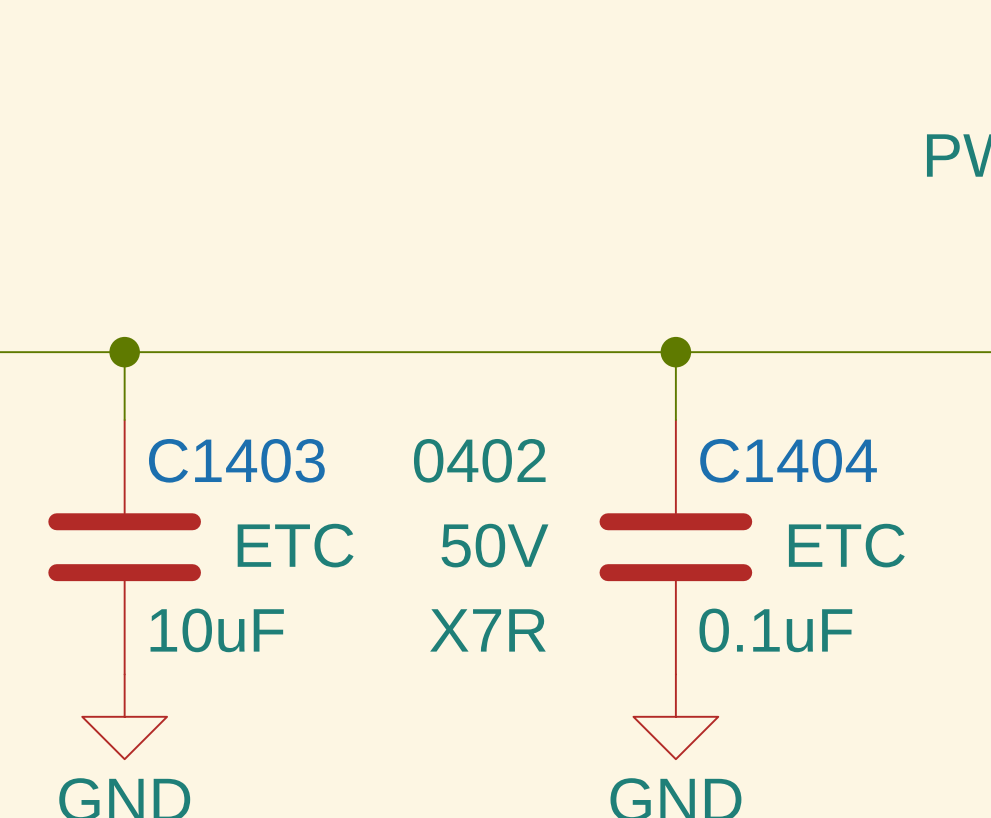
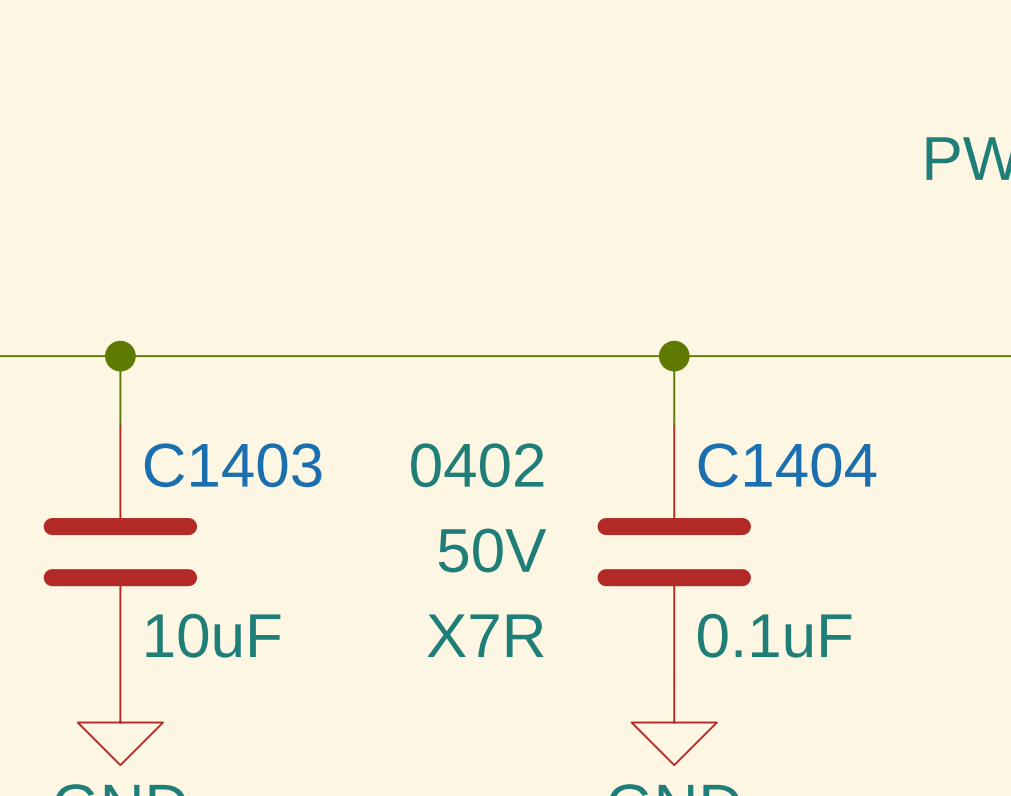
C1403 text: ETC (295, 545) -> none
C1404 text: ETC (846, 545) -> none

